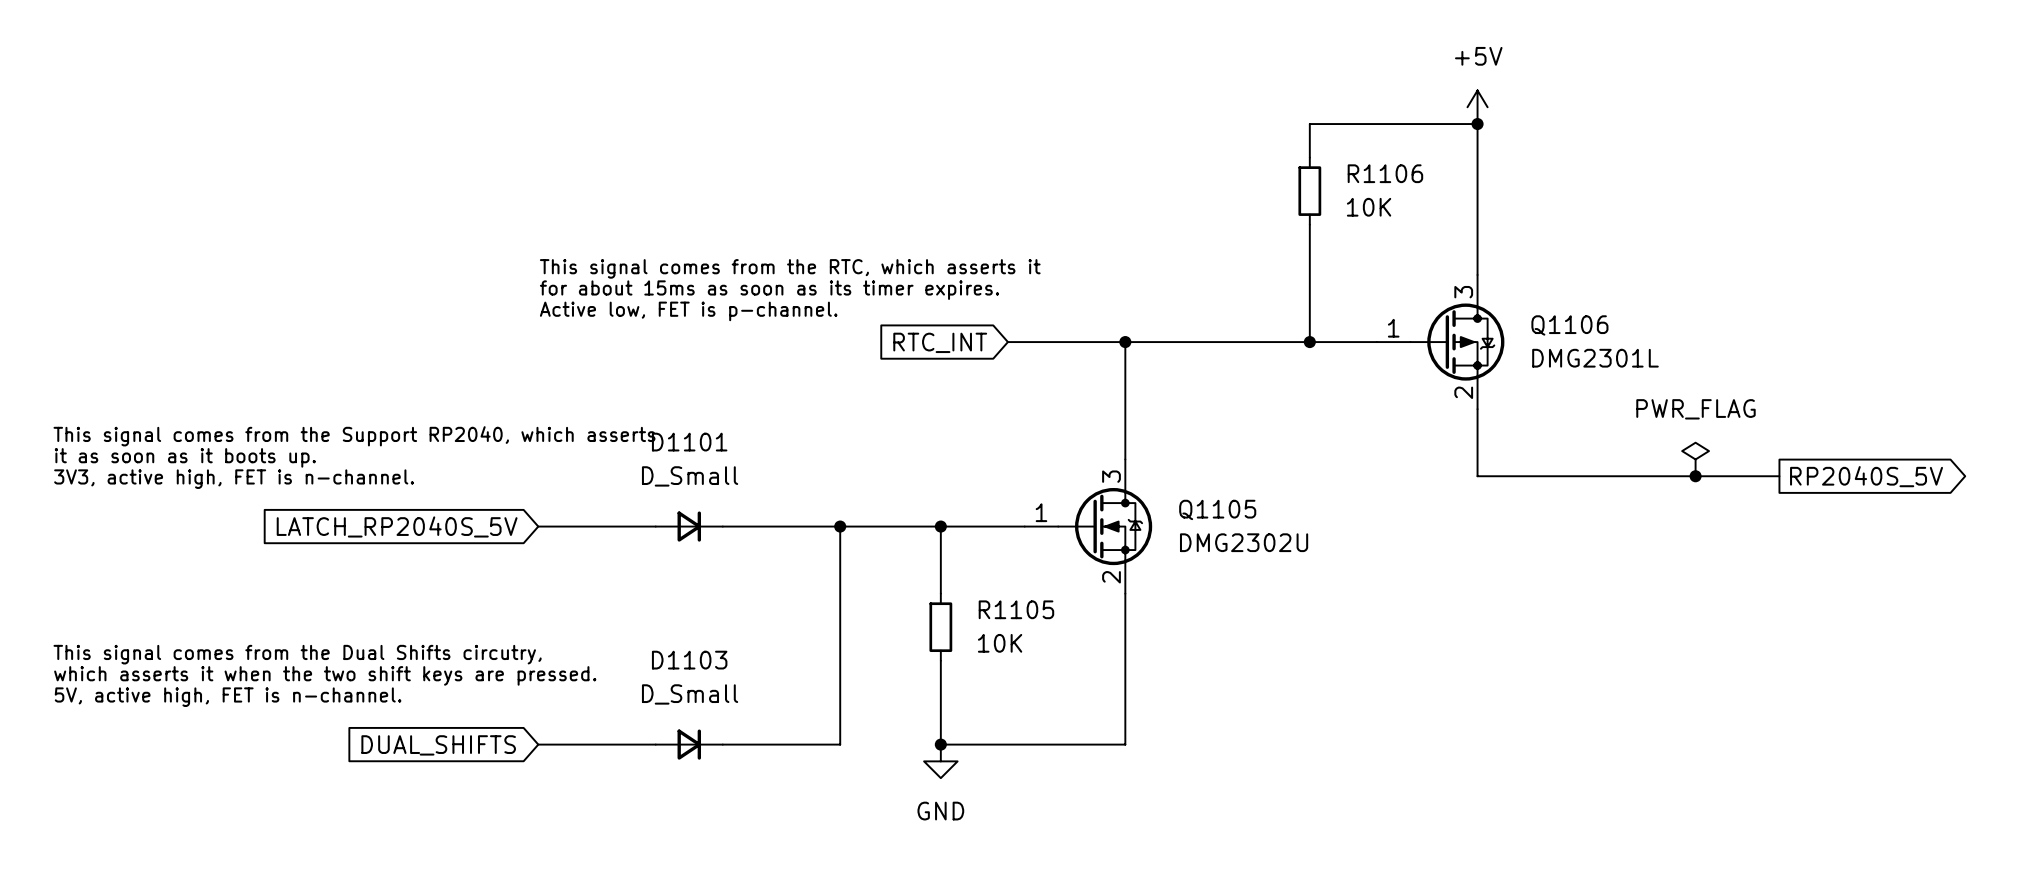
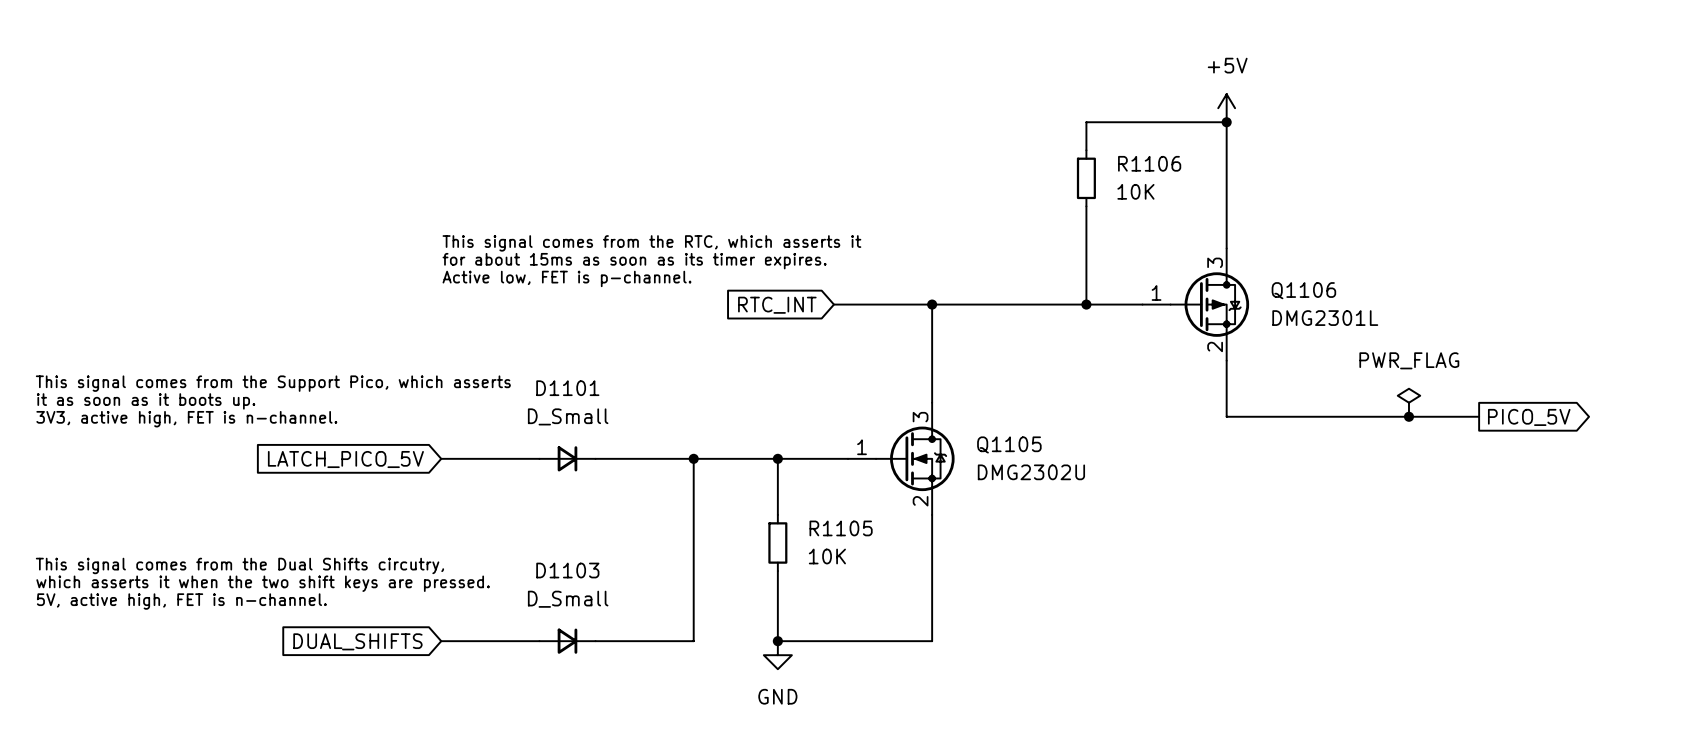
text: This signal comes from the Support RP2040, which asserts (354, 436) -> This signal comes from the Support Pico, which asserts (273, 383)
global label: RP2040S_5V (1866, 476) -> PICO_5V (1529, 417)
global label: LATCH_RP2040S_5V (397, 526) -> LATCH_PICO_5V (345, 459)

